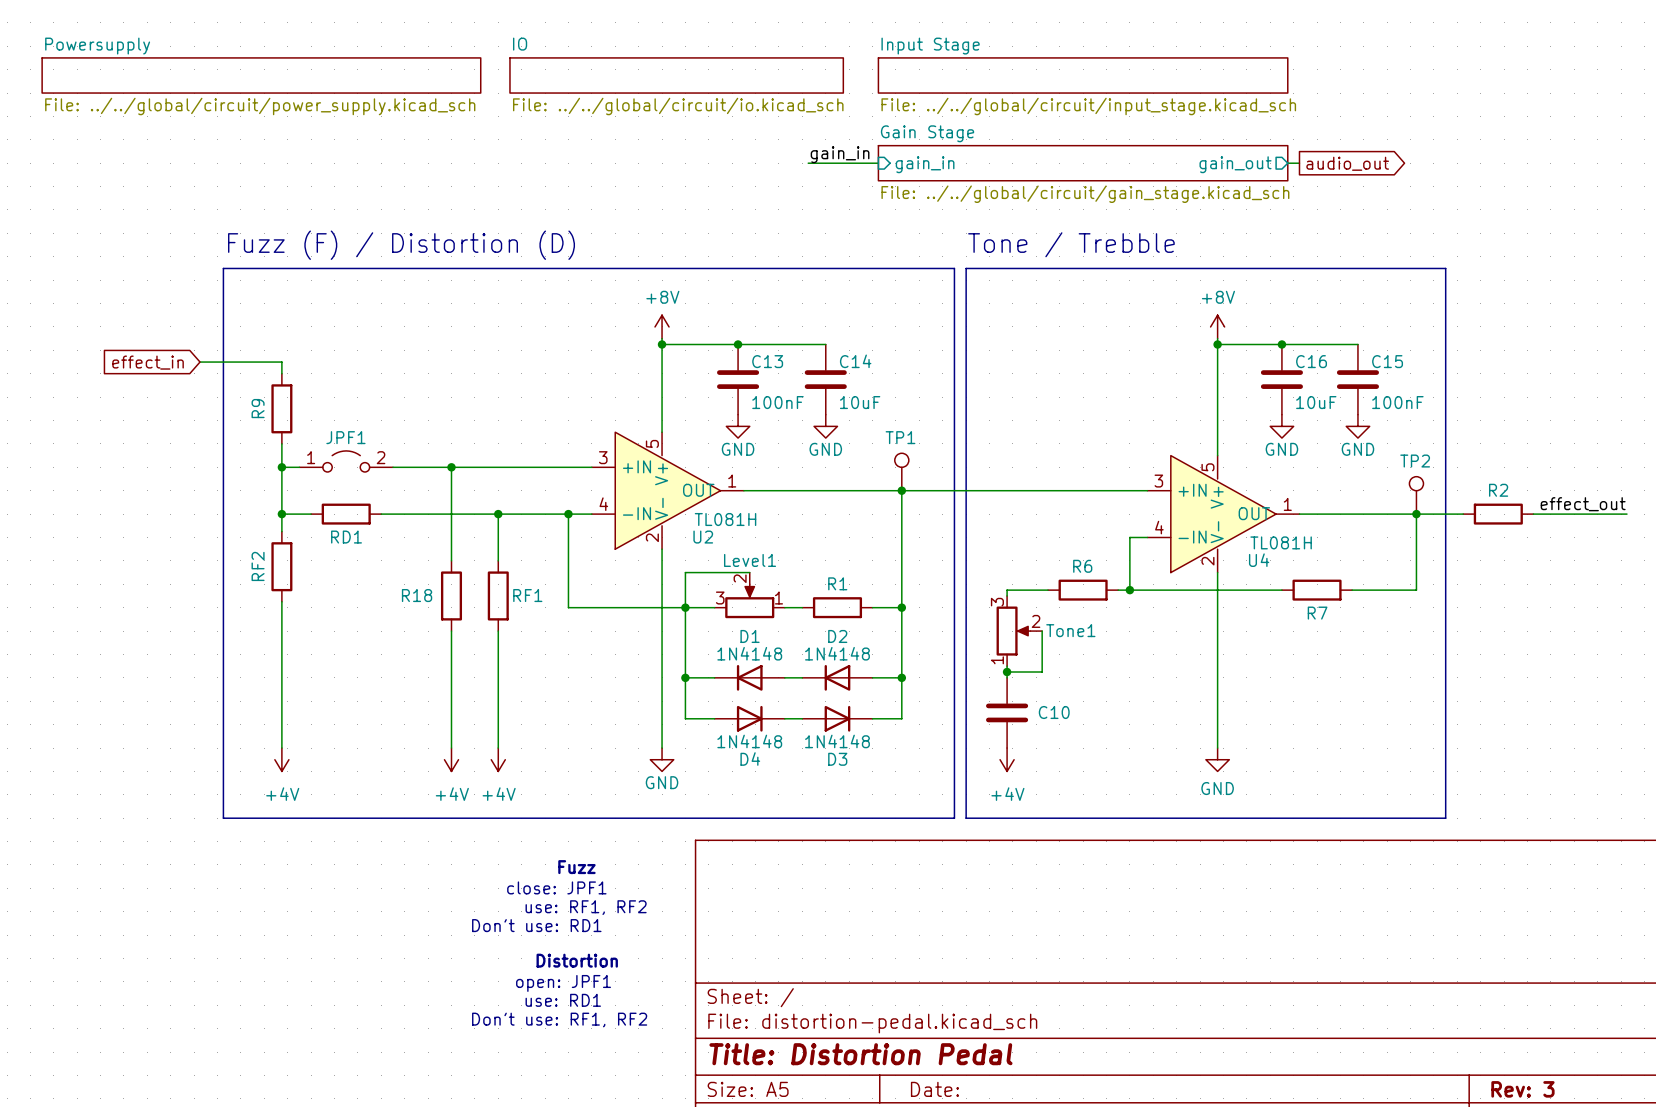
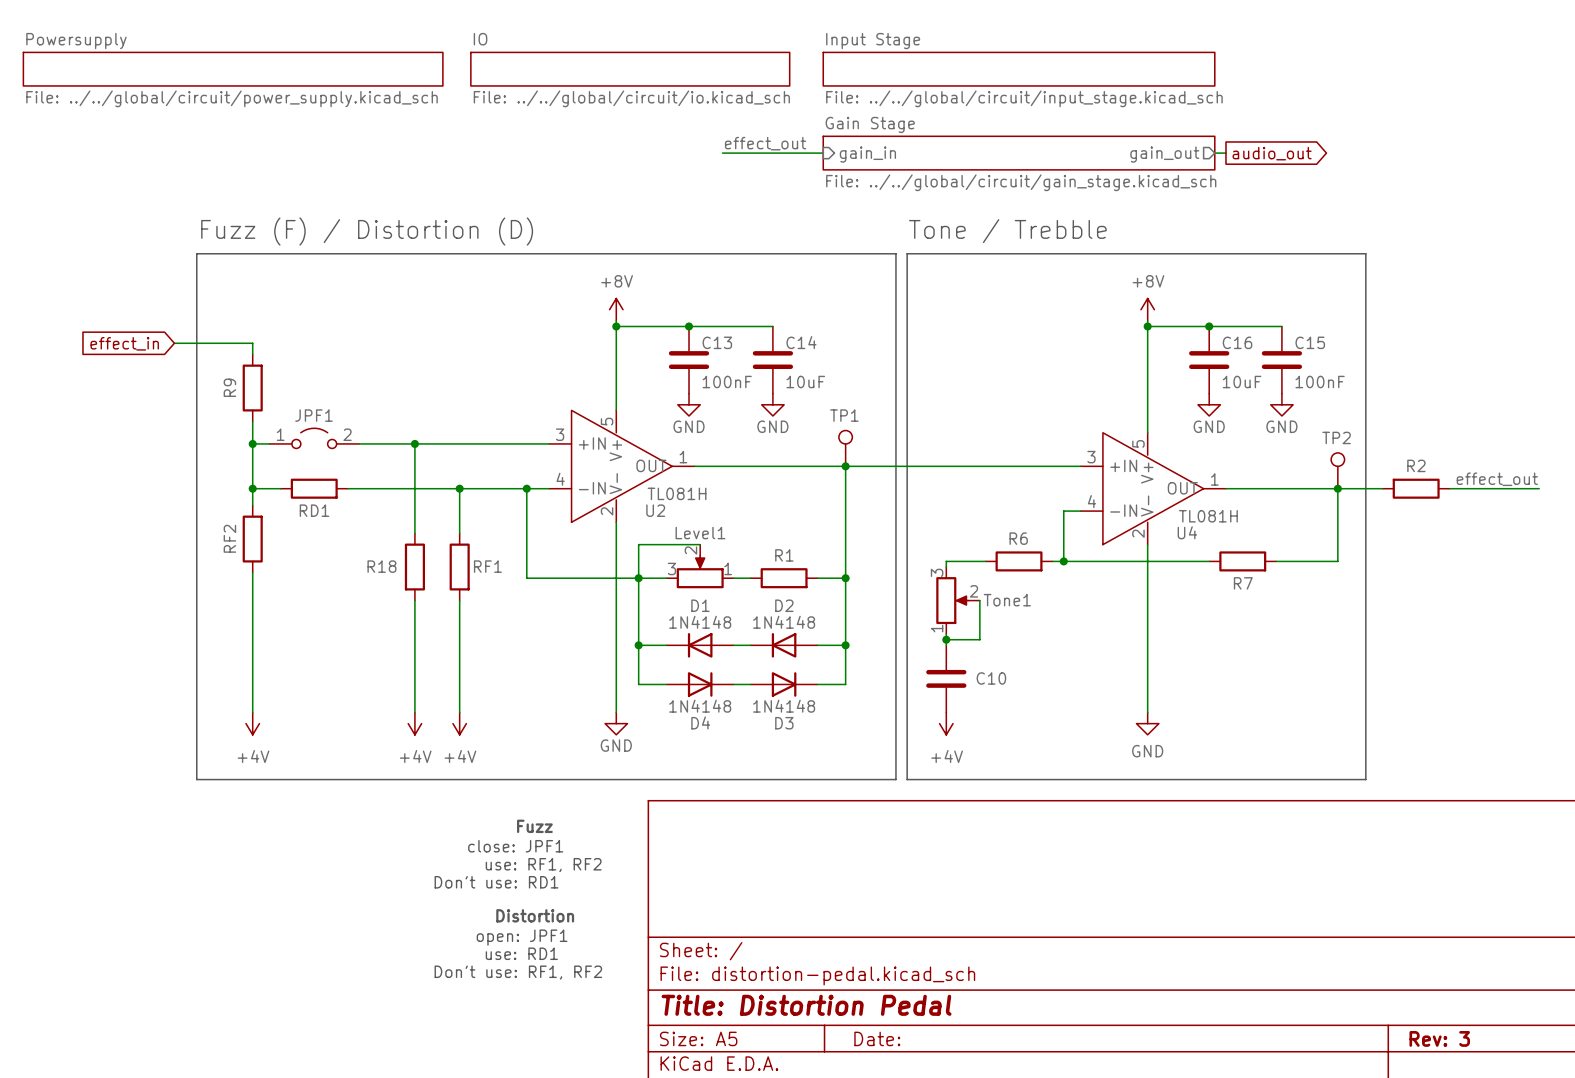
label: none -> effect_out (765, 143)
label: gain_in (840, 154) -> none
wire: none -> (722, 153) (756, 153)

